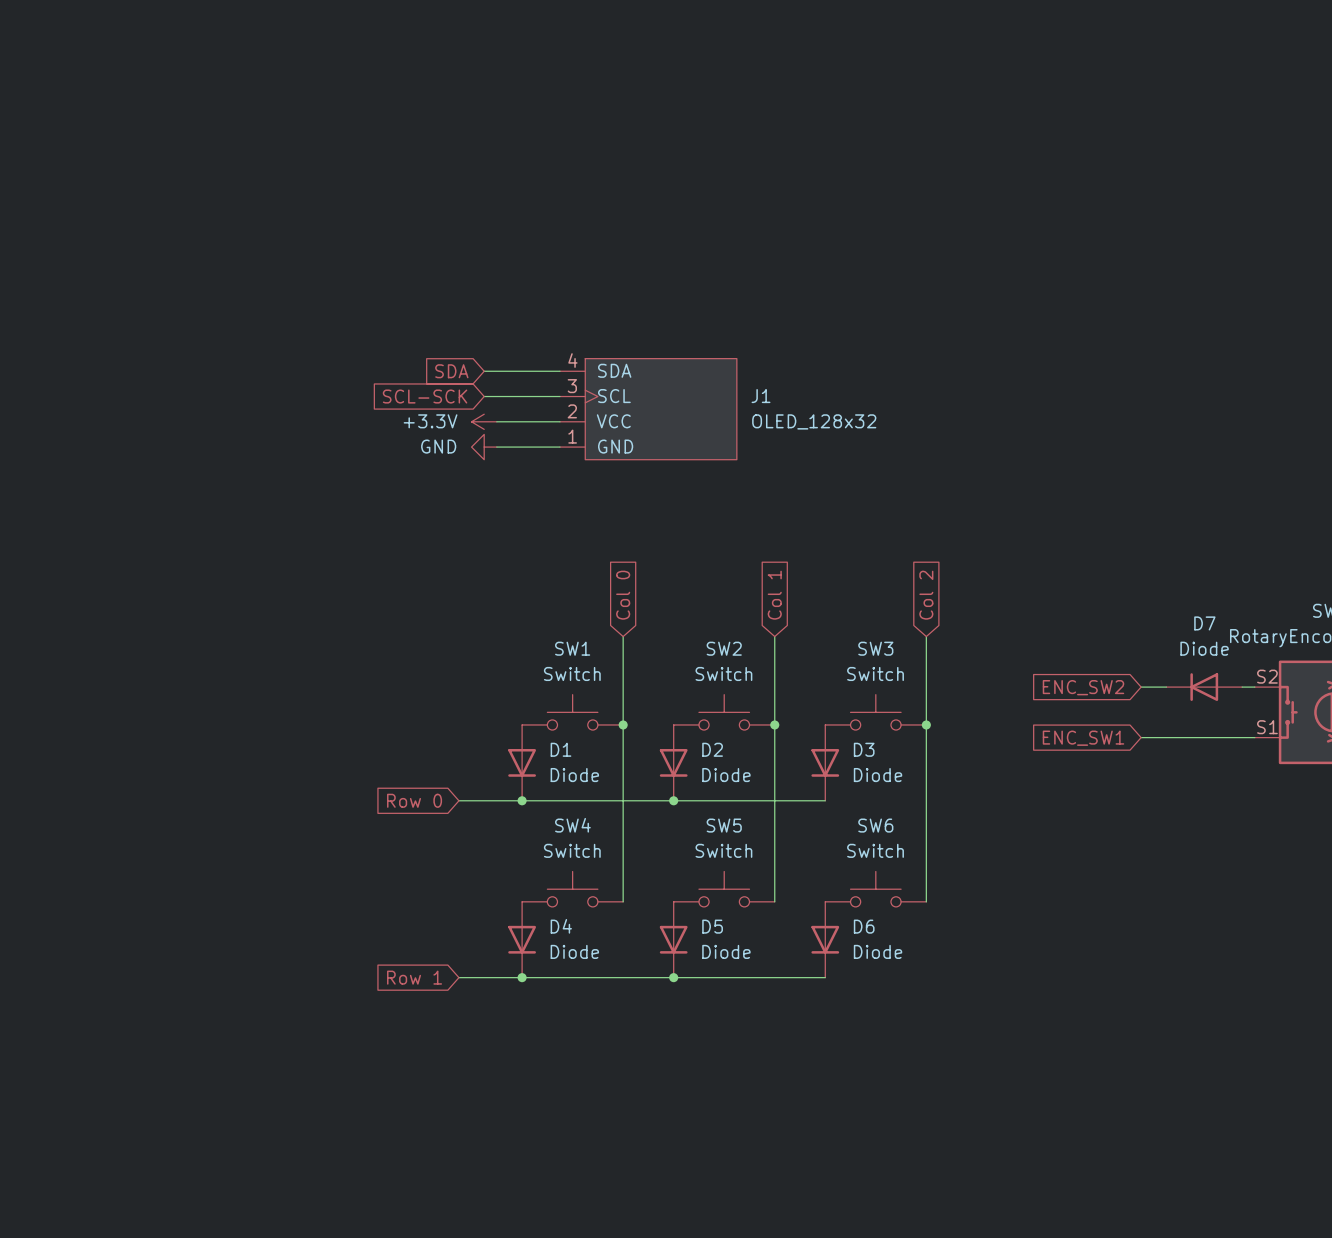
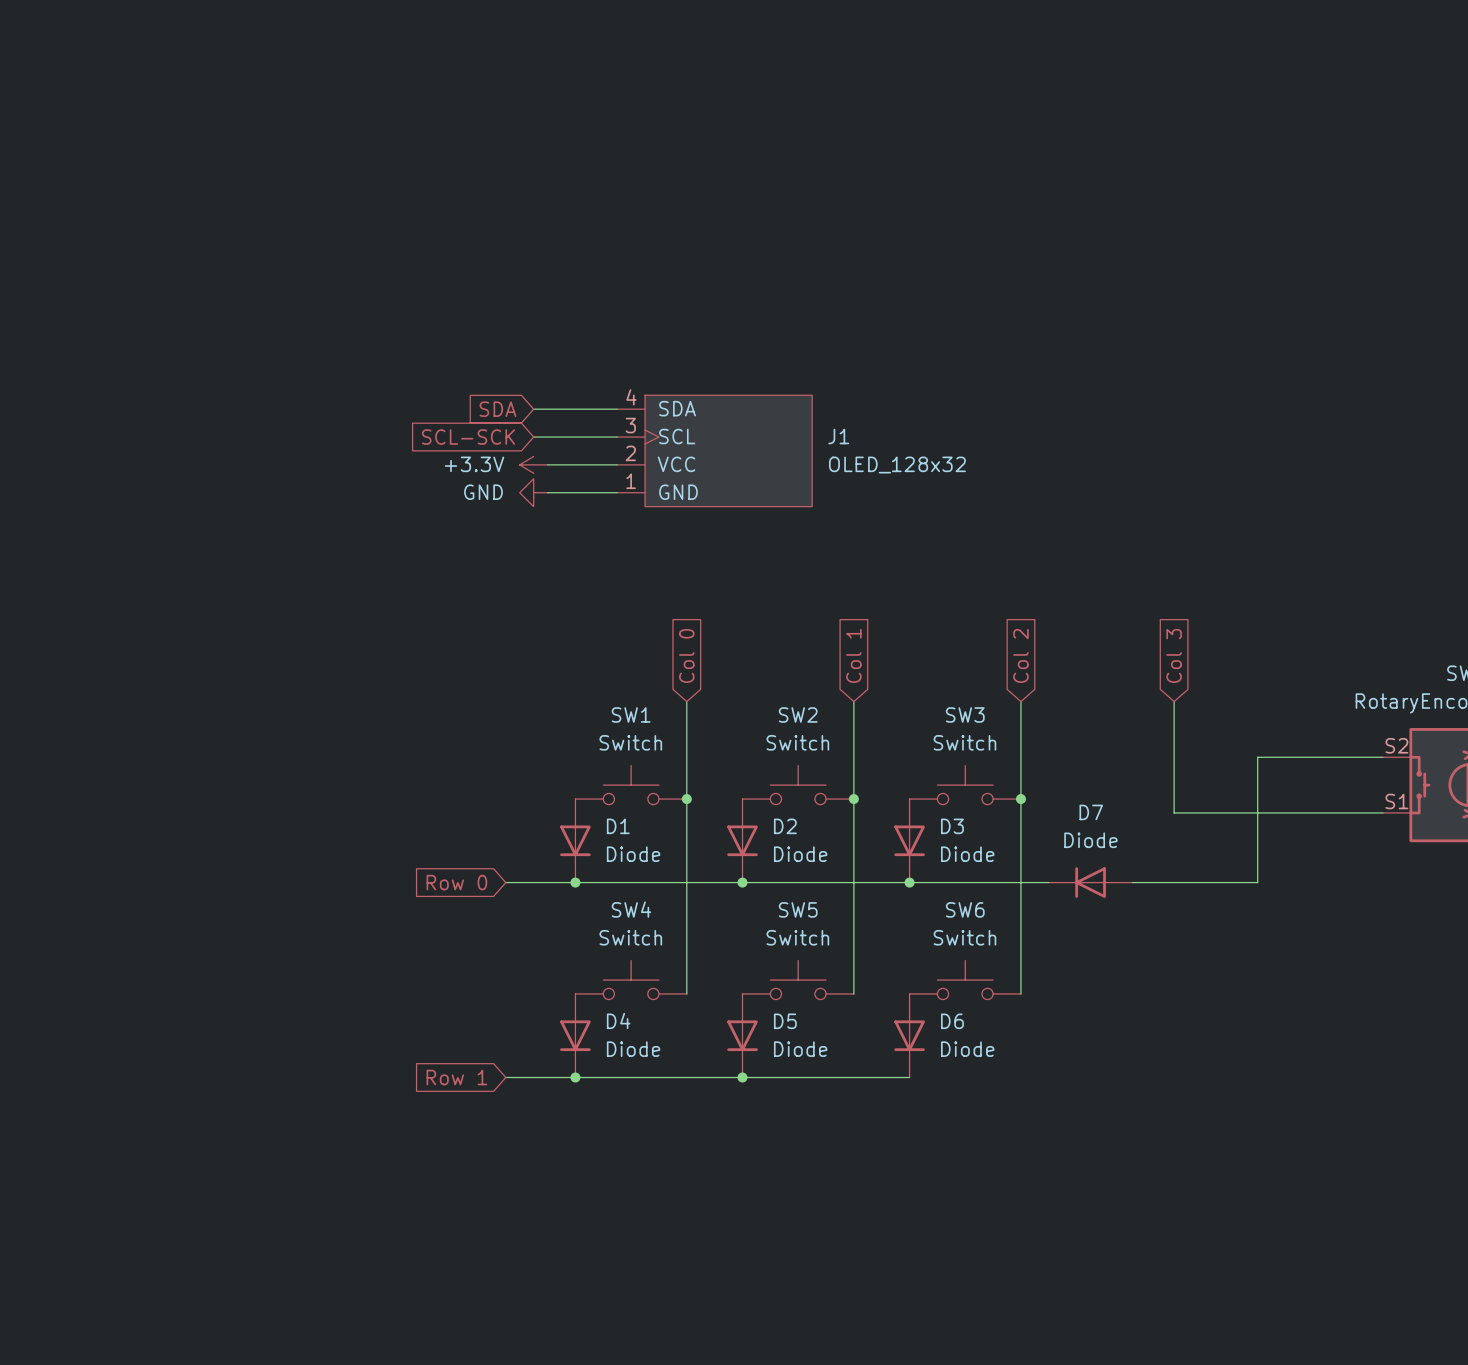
global label: none -> Col 3 (1174, 655)
wire: none -> (1174, 701) (1174, 812) (1257, 812)
global label: ENC_SW2 (1083, 687) -> none
wire: none -> (1257, 757) (1257, 882) (1132, 882)
D7 position: (1204, 687) -> (1090, 882)
global label: ENC_SW1 (1083, 738) -> none
wire: none -> (909, 882) (1048, 882)
junction: none -> (909, 882)

